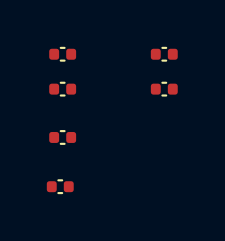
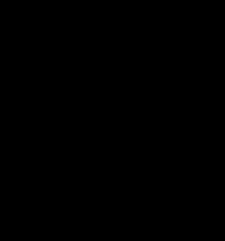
part: (62, 54) -> none
part: (164, 54) -> none
part: (62, 89) -> none
part: (164, 89) -> none
part: (62, 137) -> none
part: (60, 186) -> none

